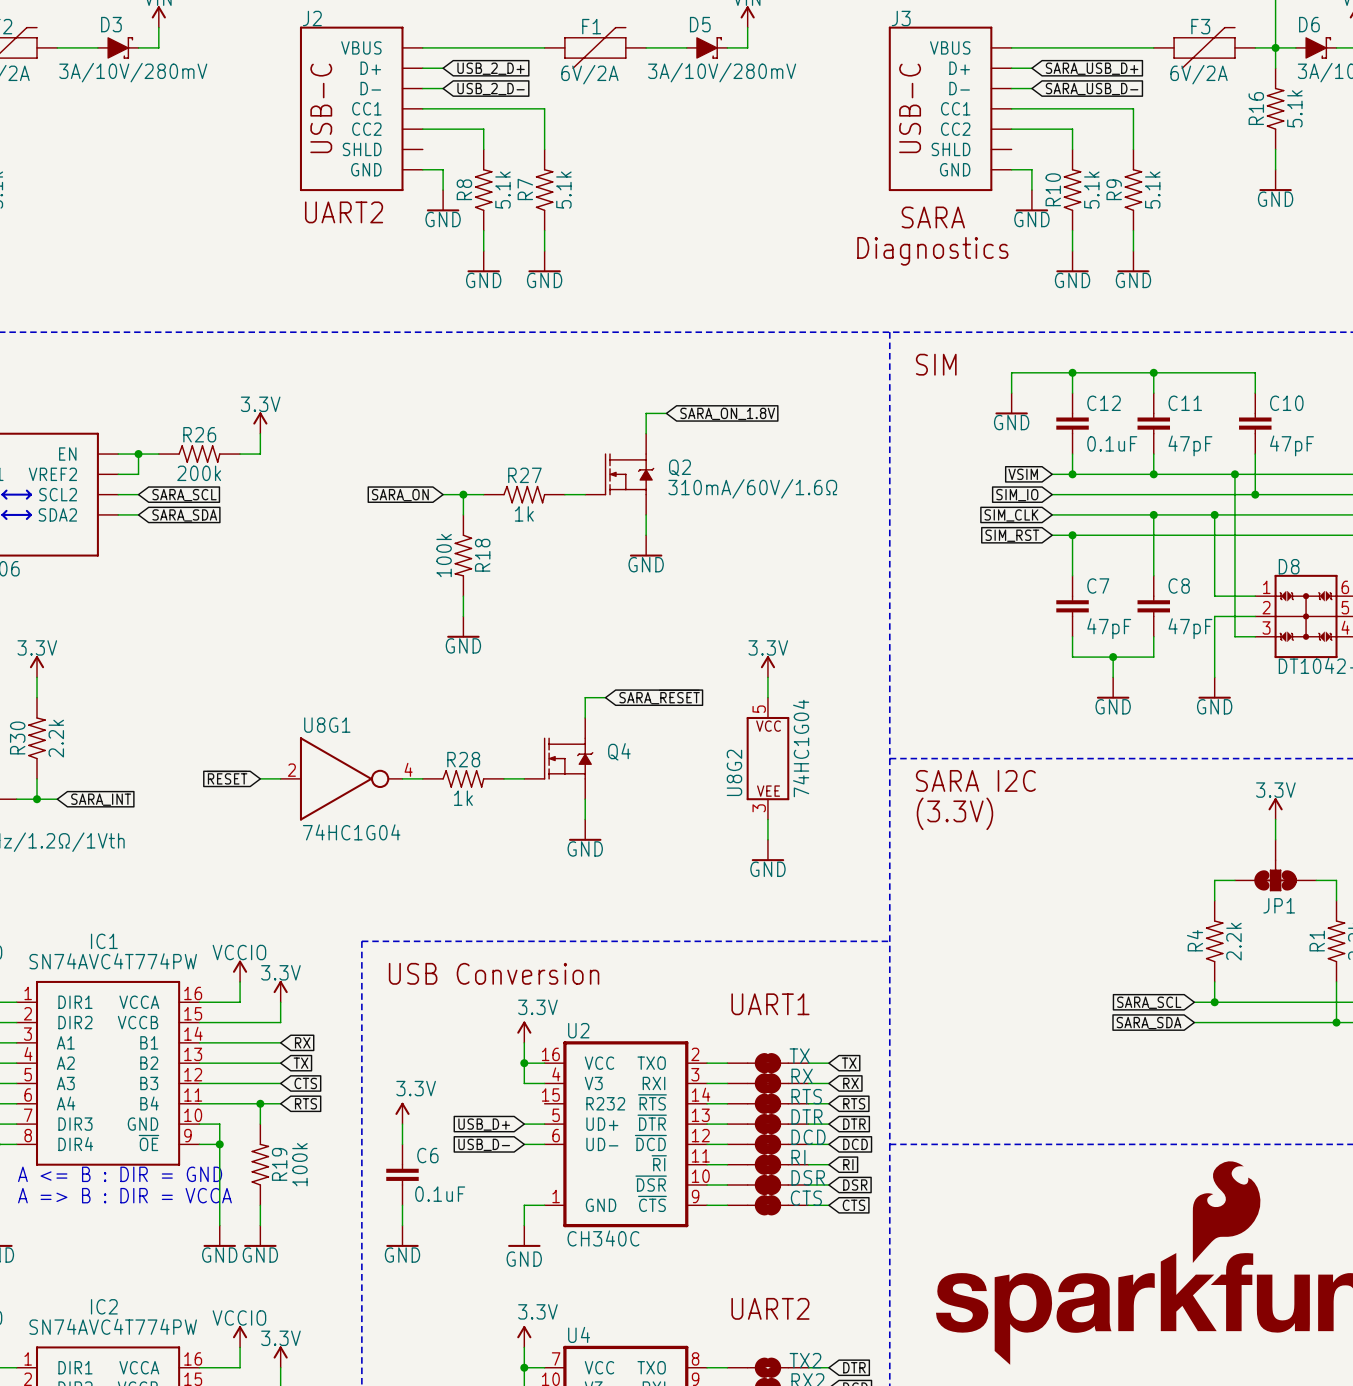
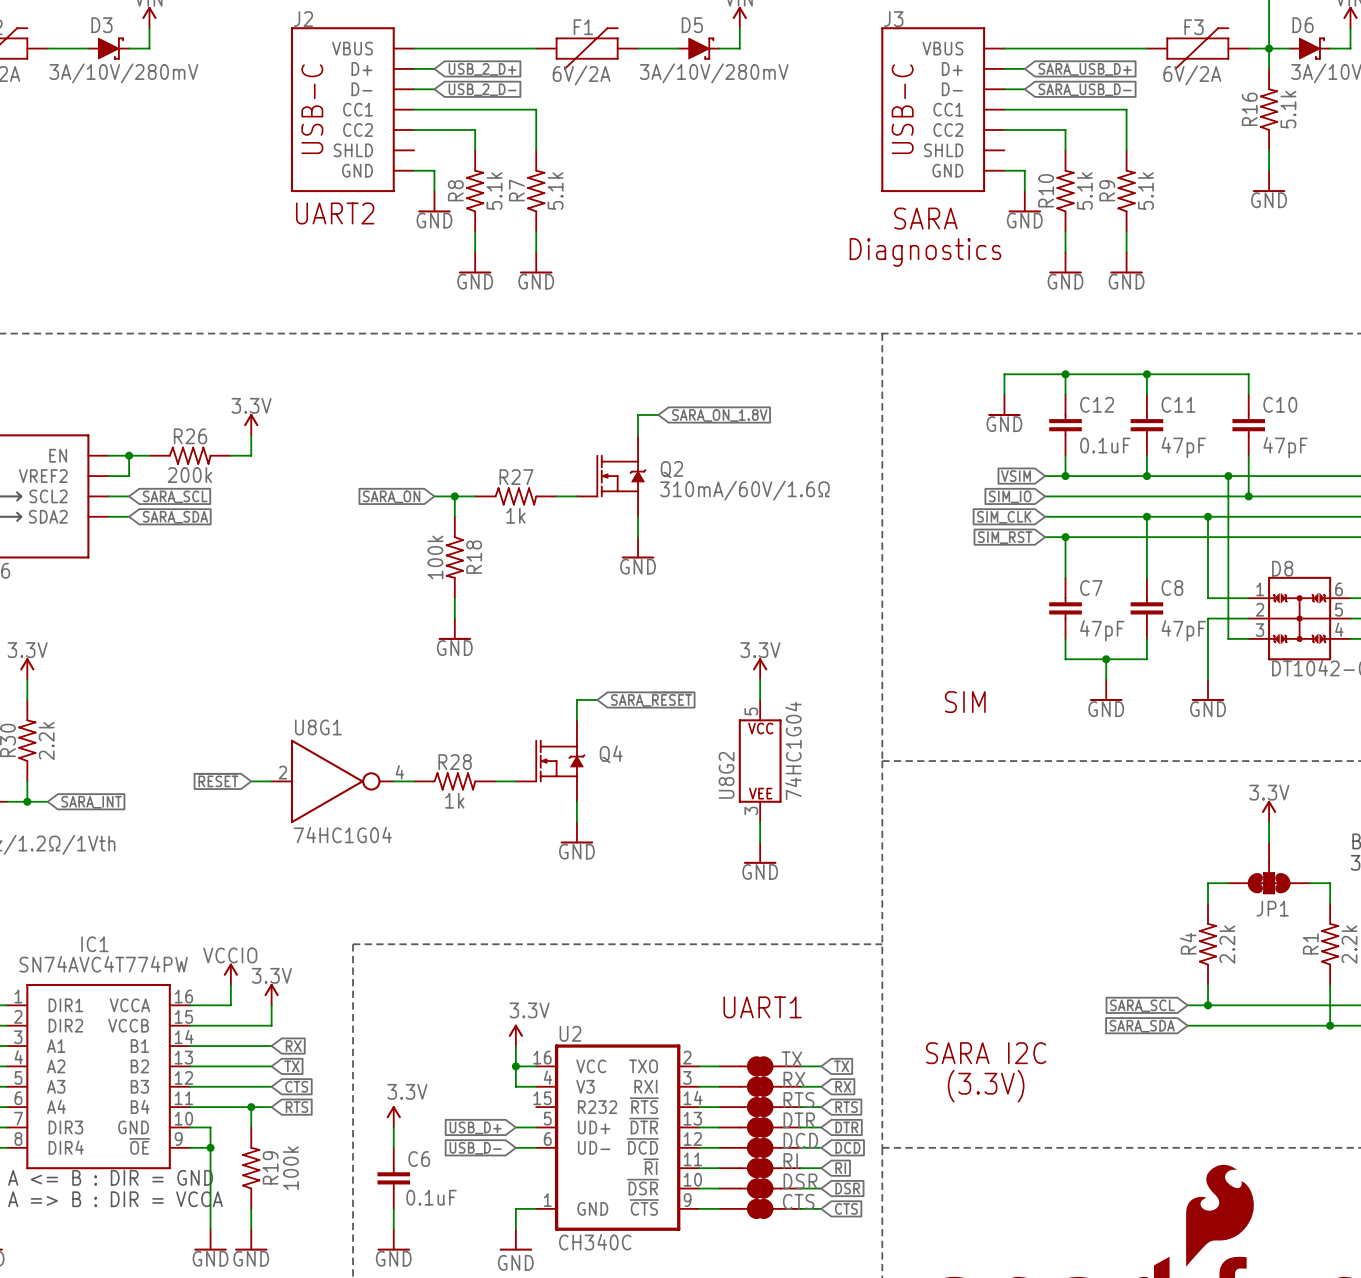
text: SIM (936, 364) -> none
text: none -> SIM (965, 702)
text: SARA I2C (975, 780) -> none
text: (3.3V) (954, 813) -> none
text: USB Conversion (494, 973) -> none
text: none -> SARA I2C (986, 1053)
text: none -> (3.3V) (986, 1086)

